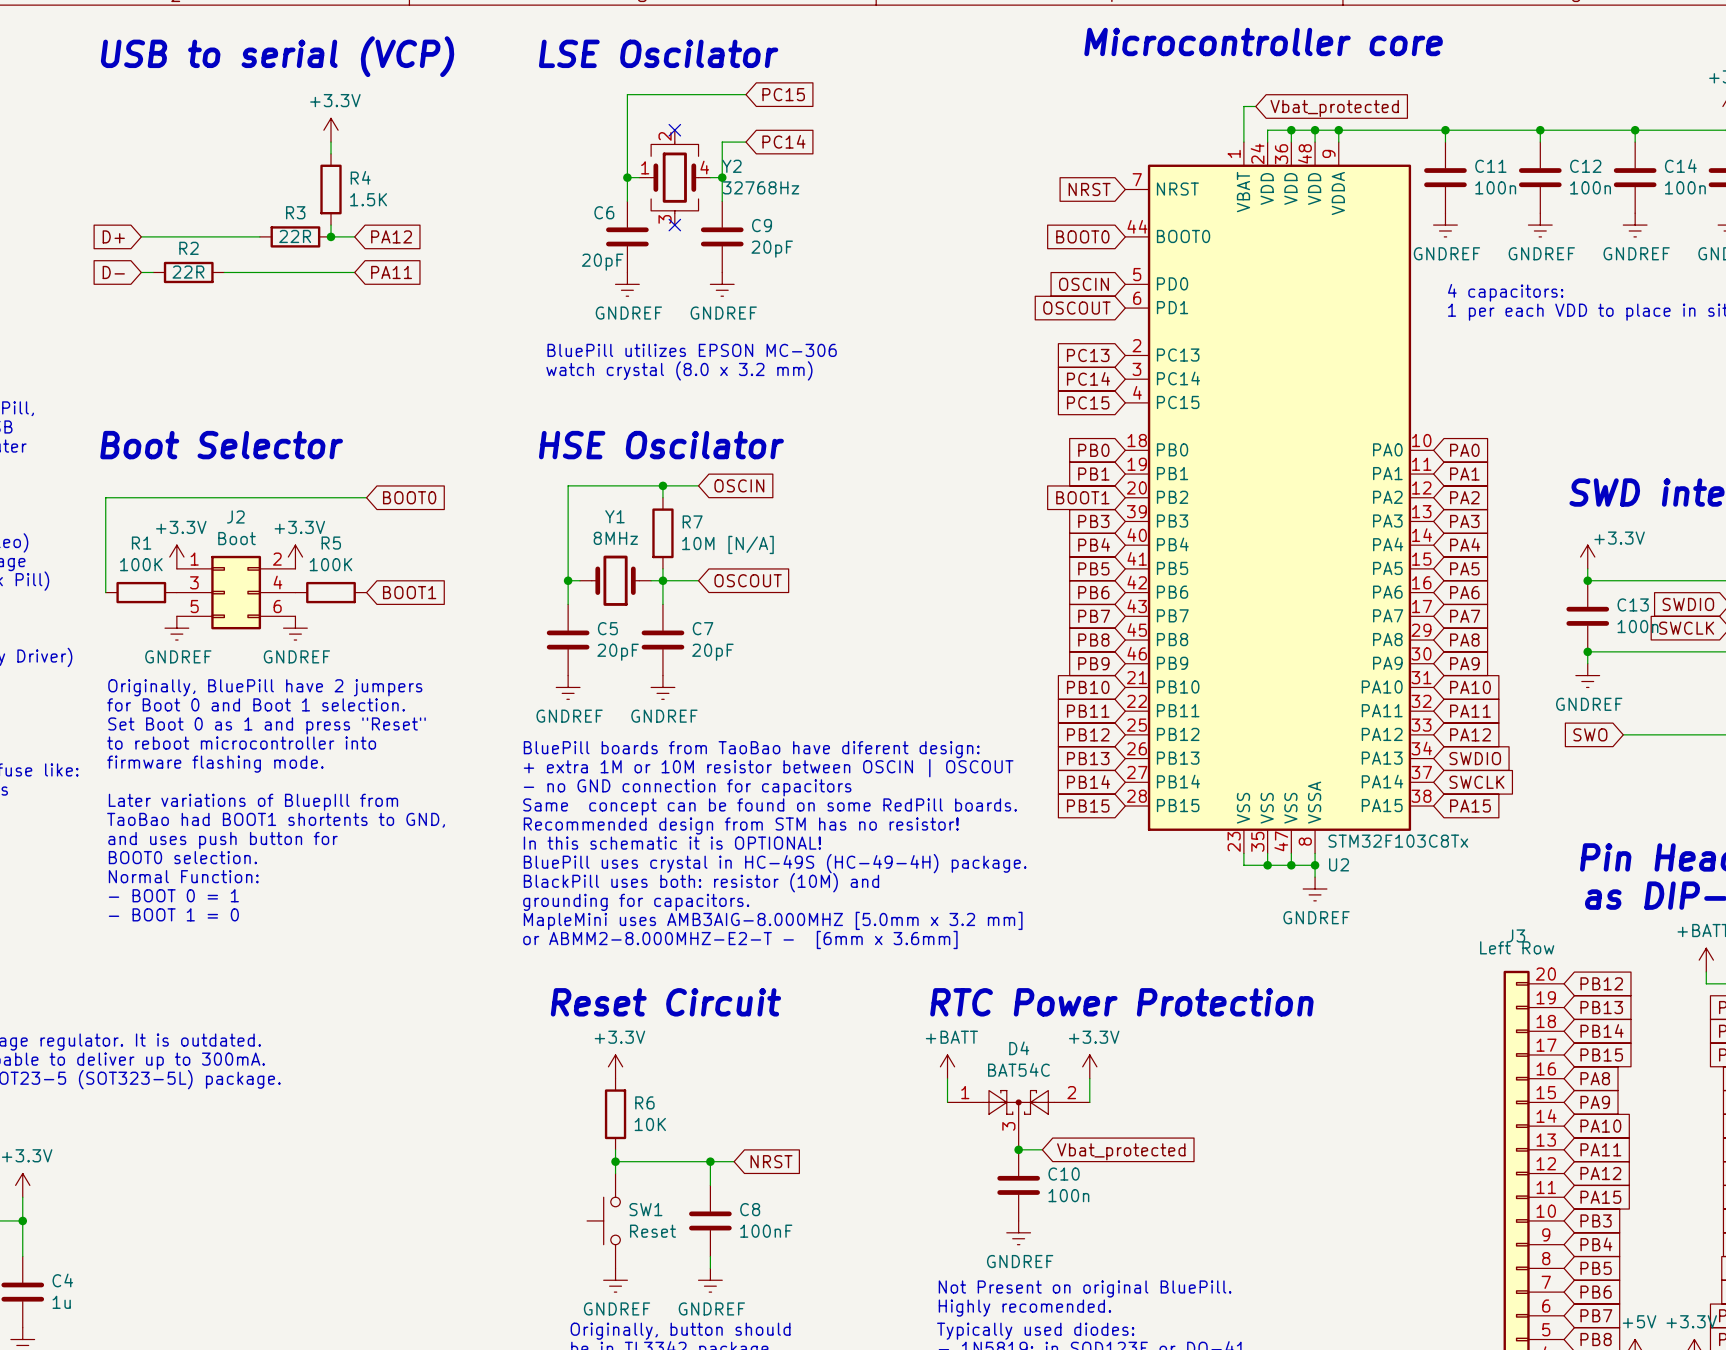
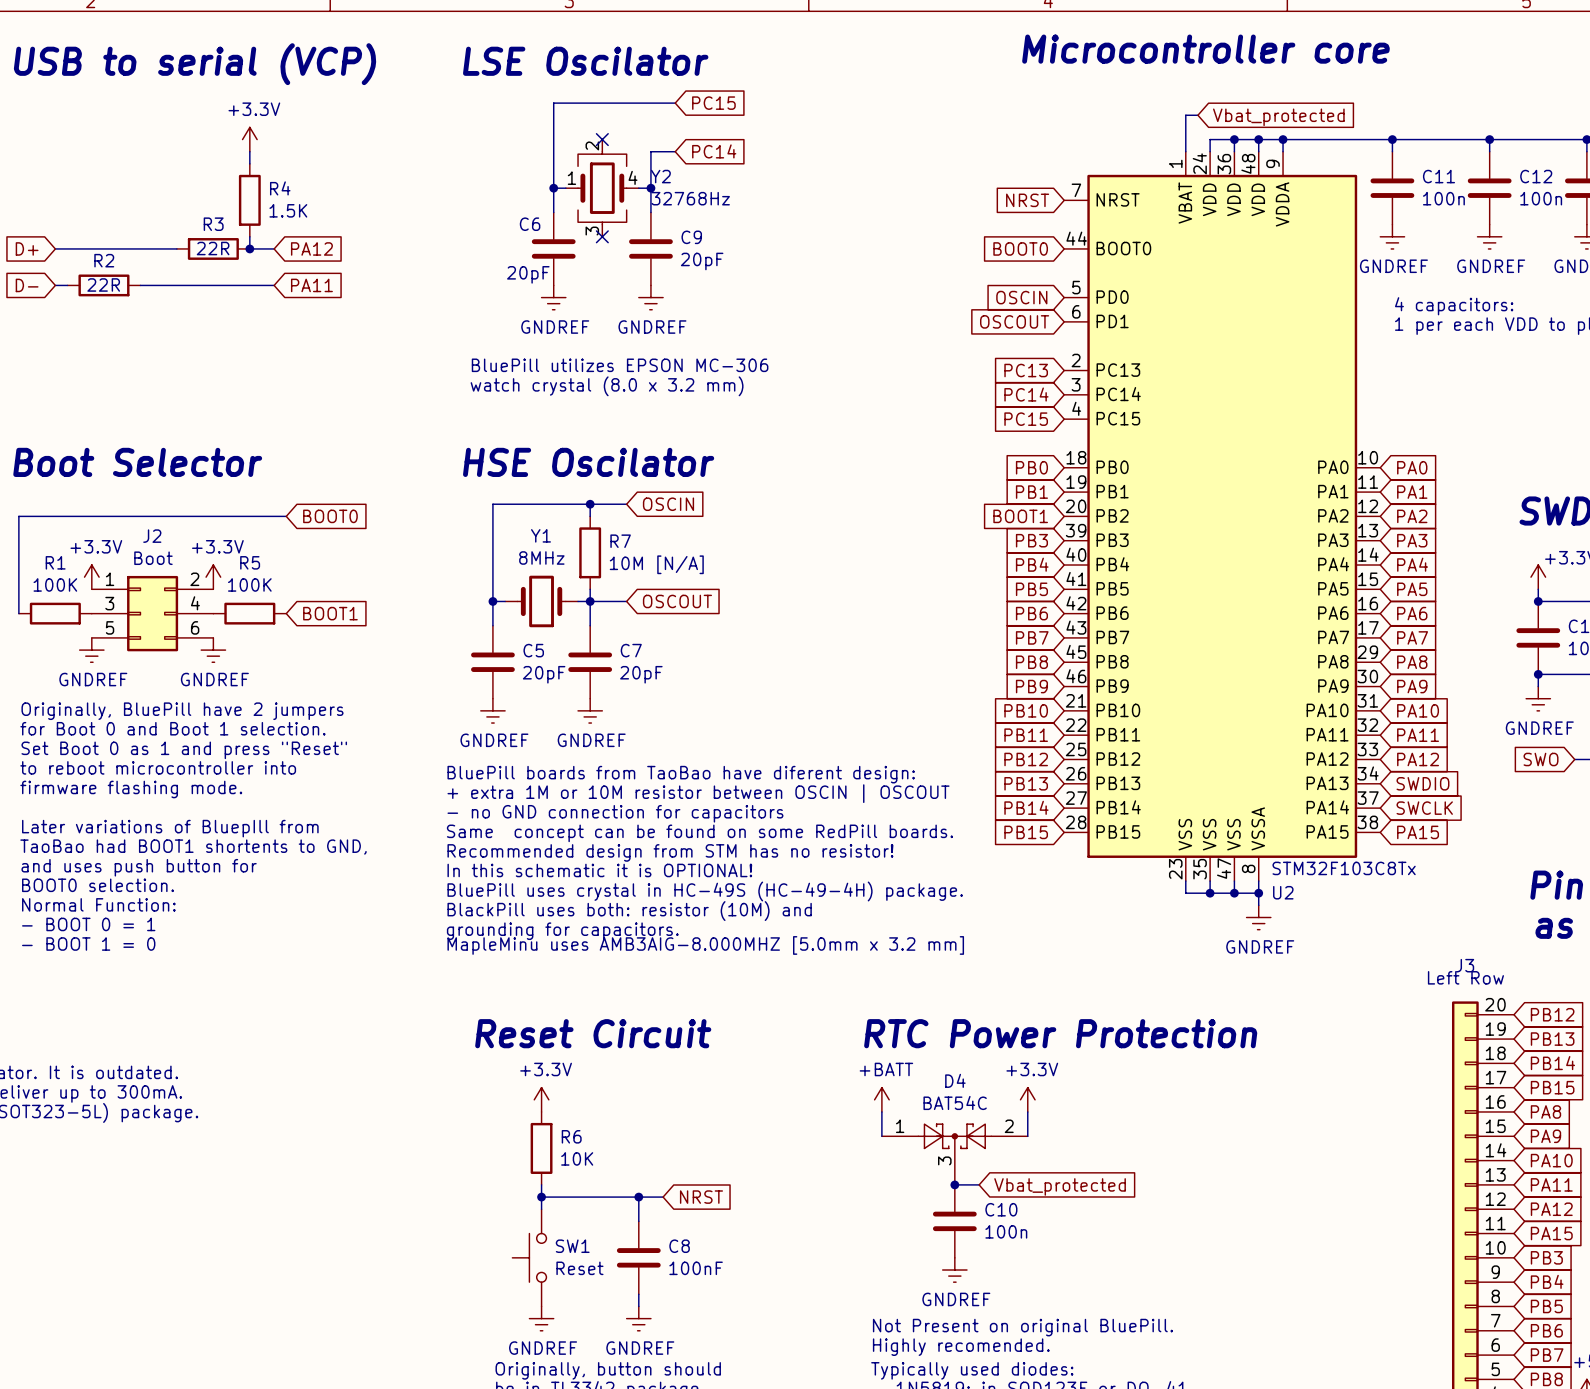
text: MapleMini uses AMB3AIG-8.000MHZ [5.0mm x 3.2 mm] (773, 920) -> MapleMinu uses AMB3AIG-8.000MHZ [5.0mm x 3.2 mm] (705, 945)
text: or ABMM2-8.000MHZ-E2-T - [6mm x 3.6mm] (740, 939) -> none

